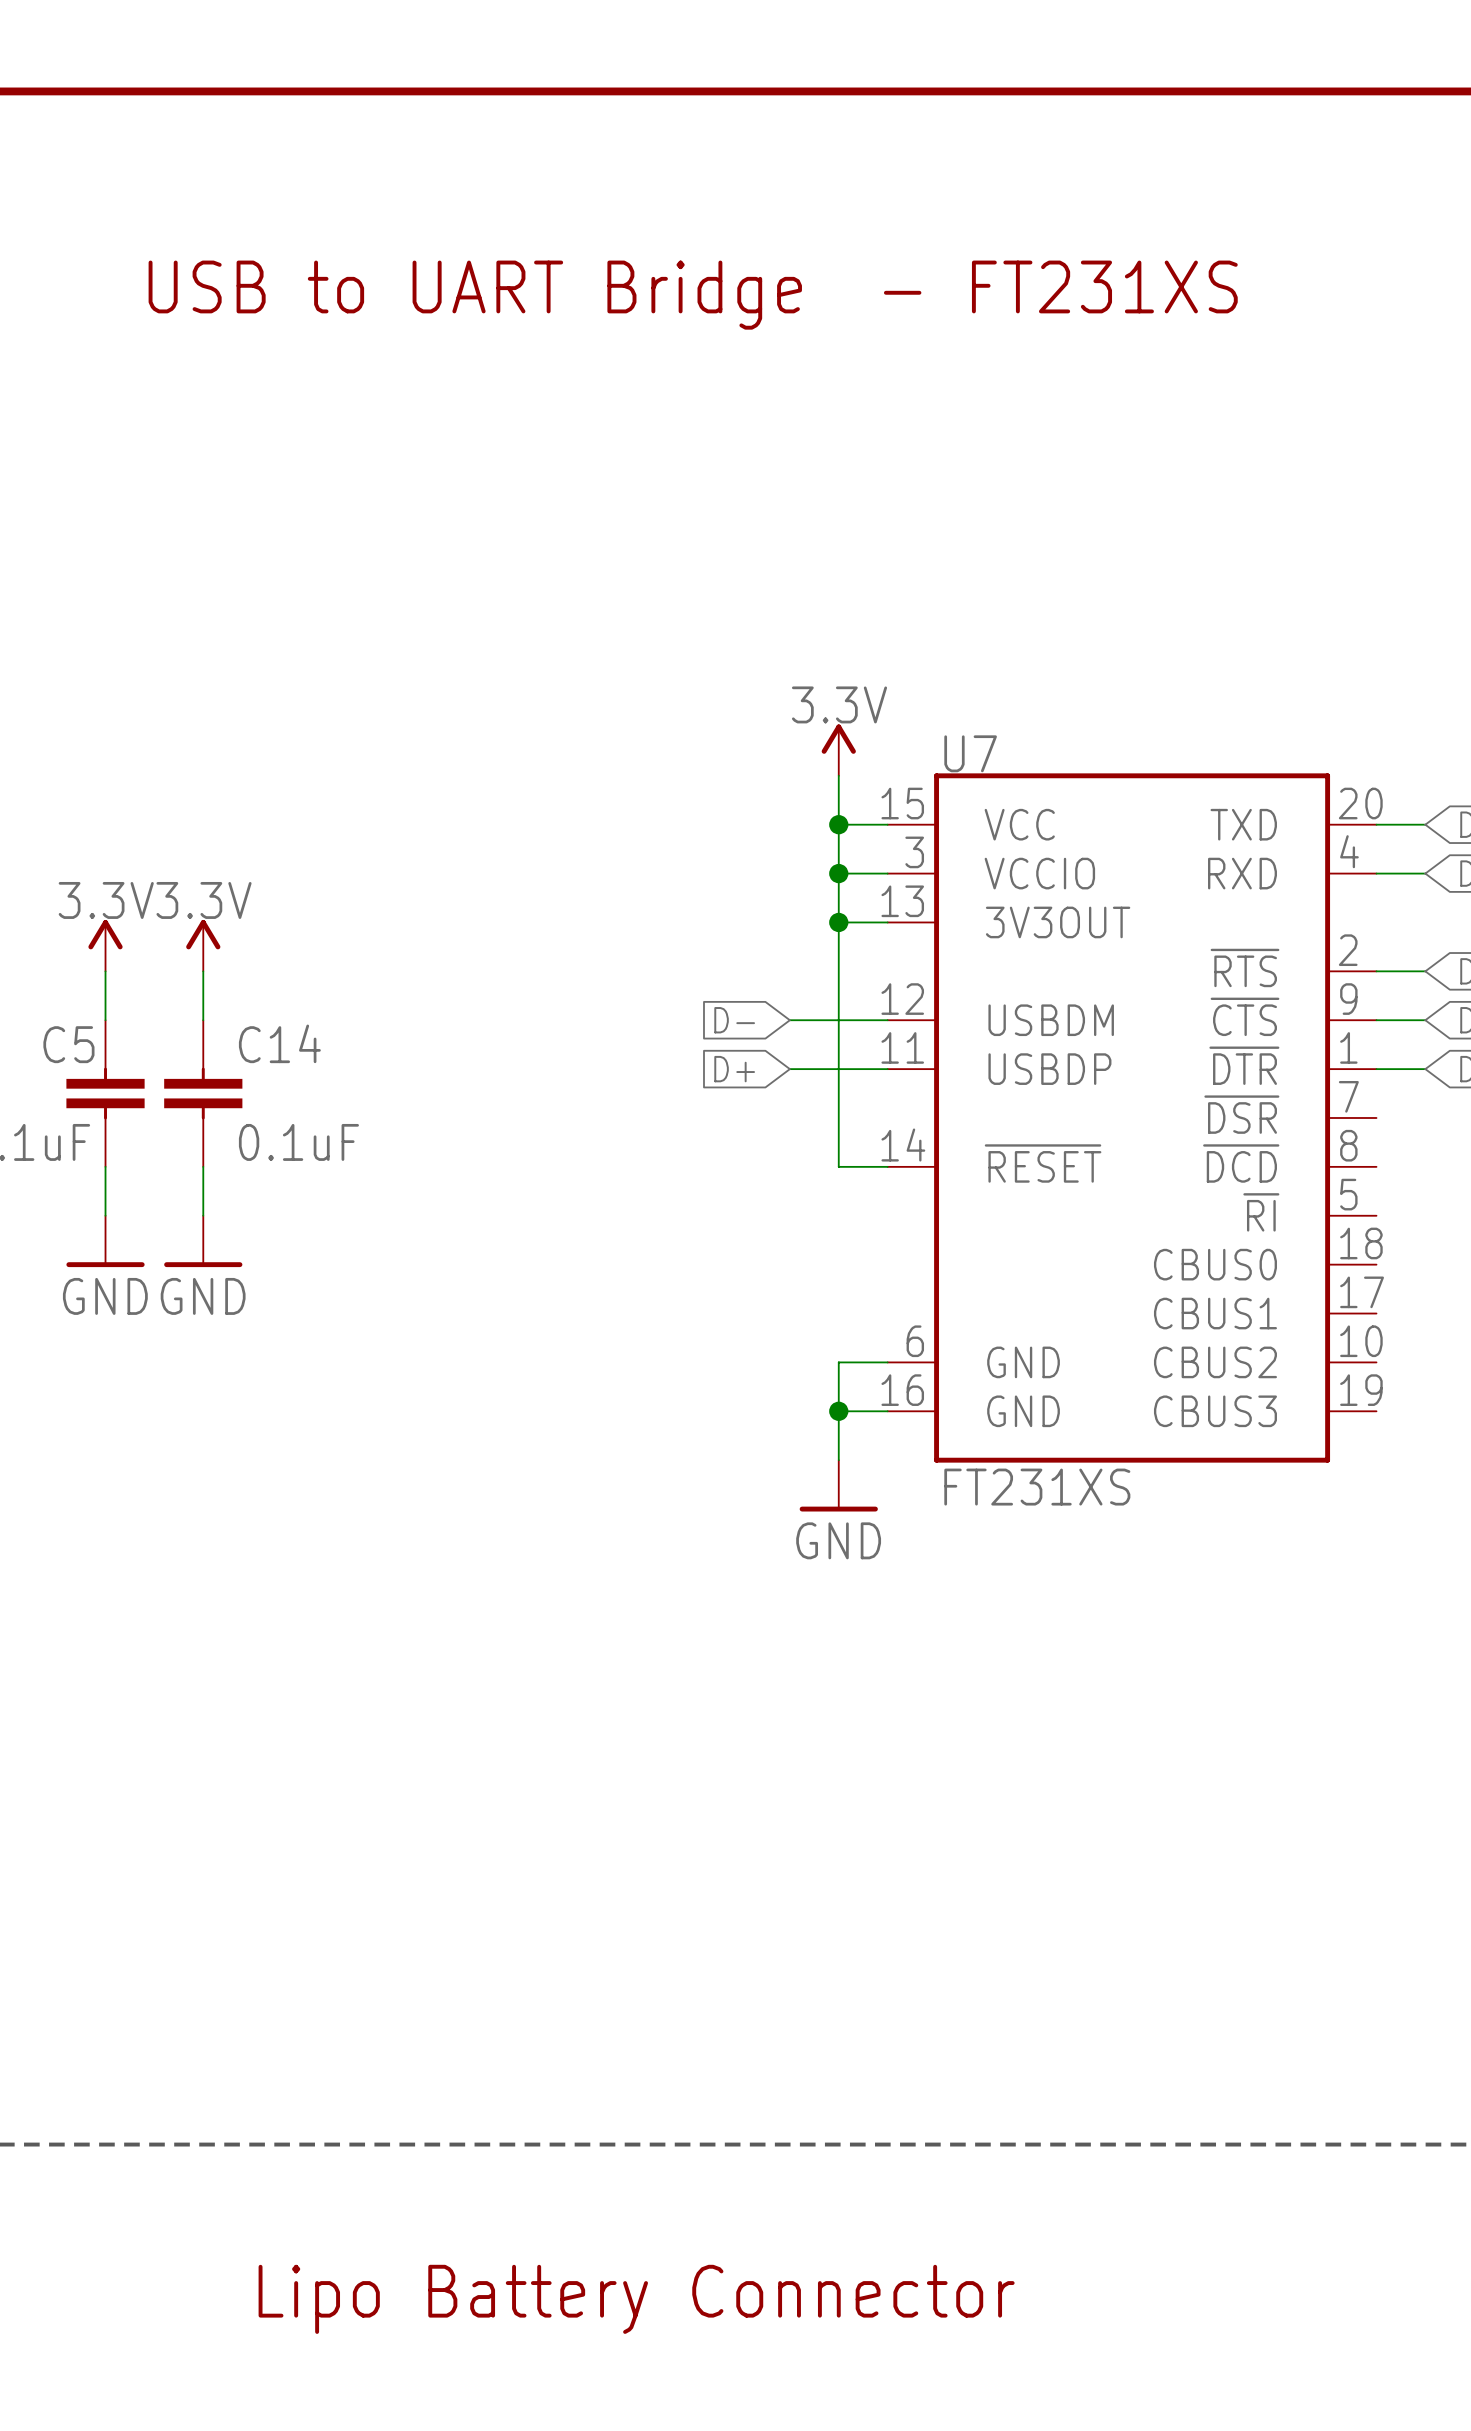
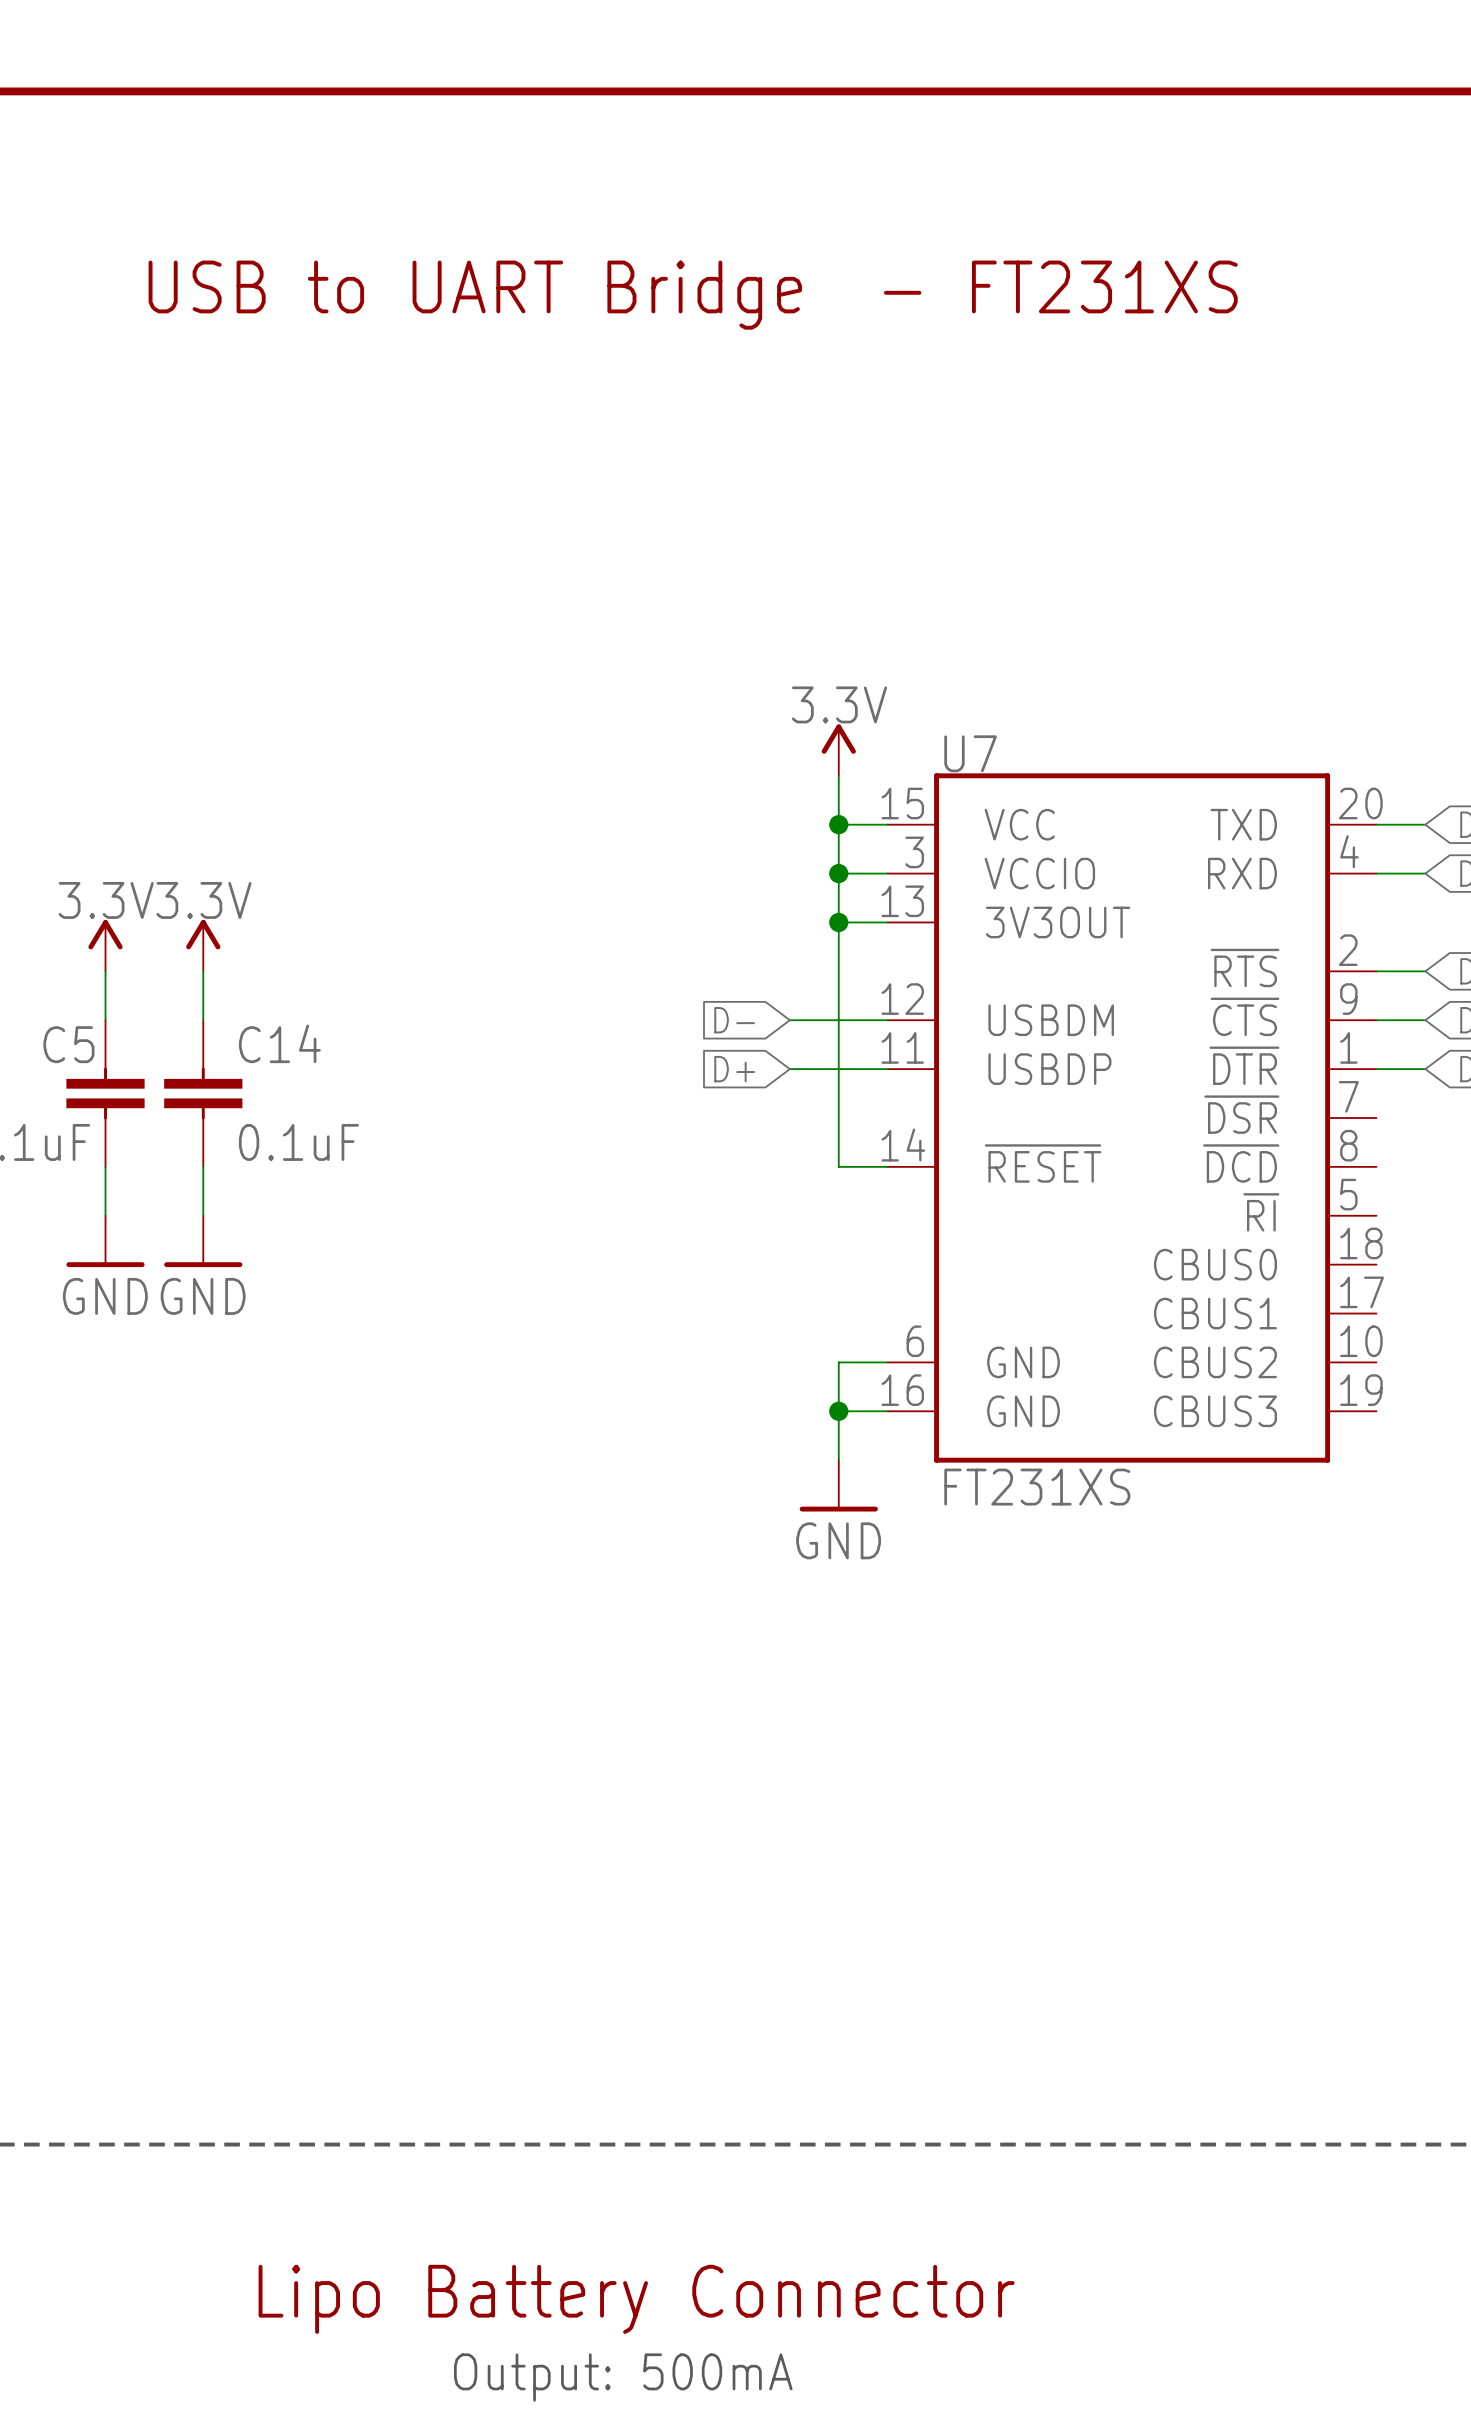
text: none -> Output: 500mA (623, 2377)

